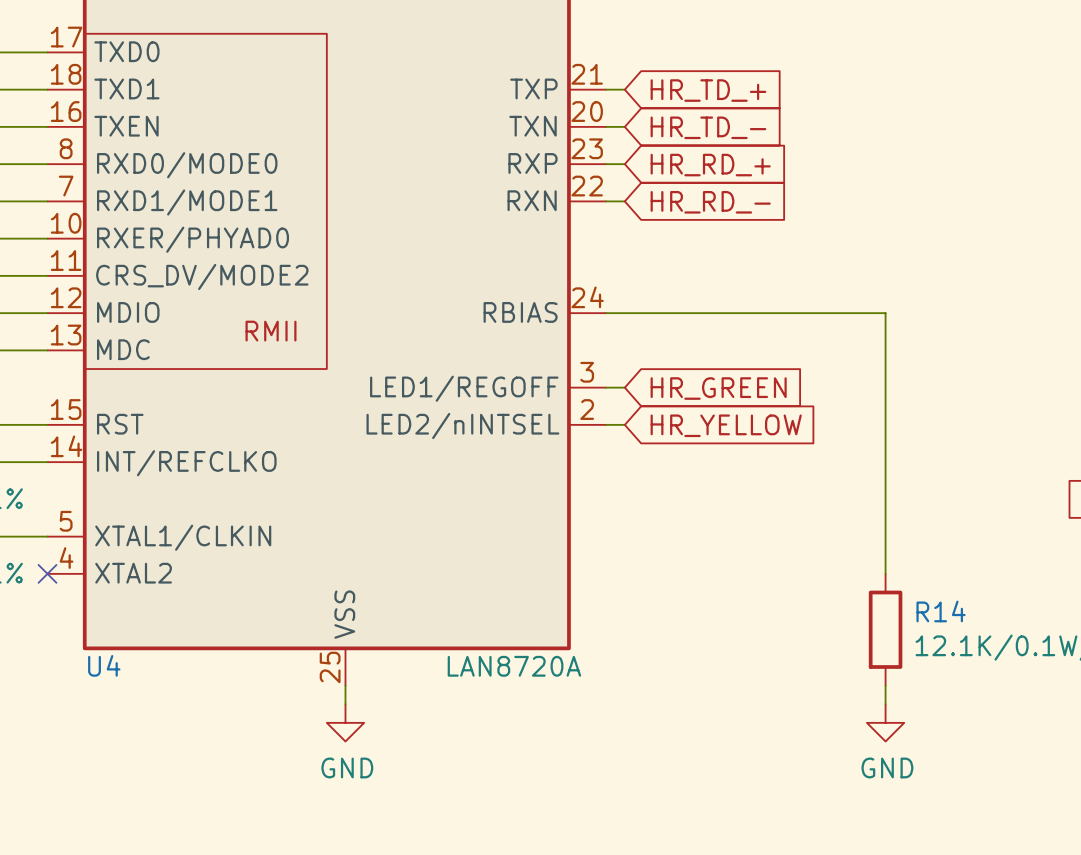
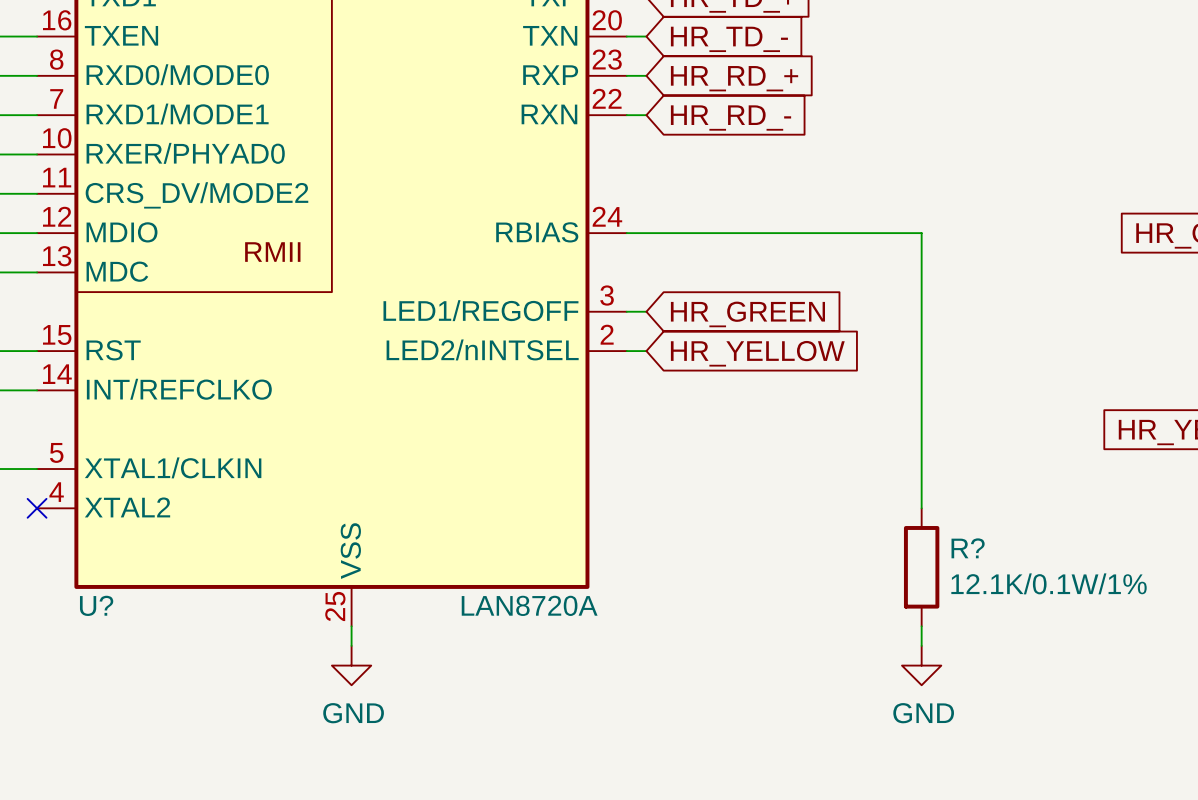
R14 name: R14 (941, 611) -> R? (968, 548)
U4 name: U4 (104, 665) -> U? (96, 605)

